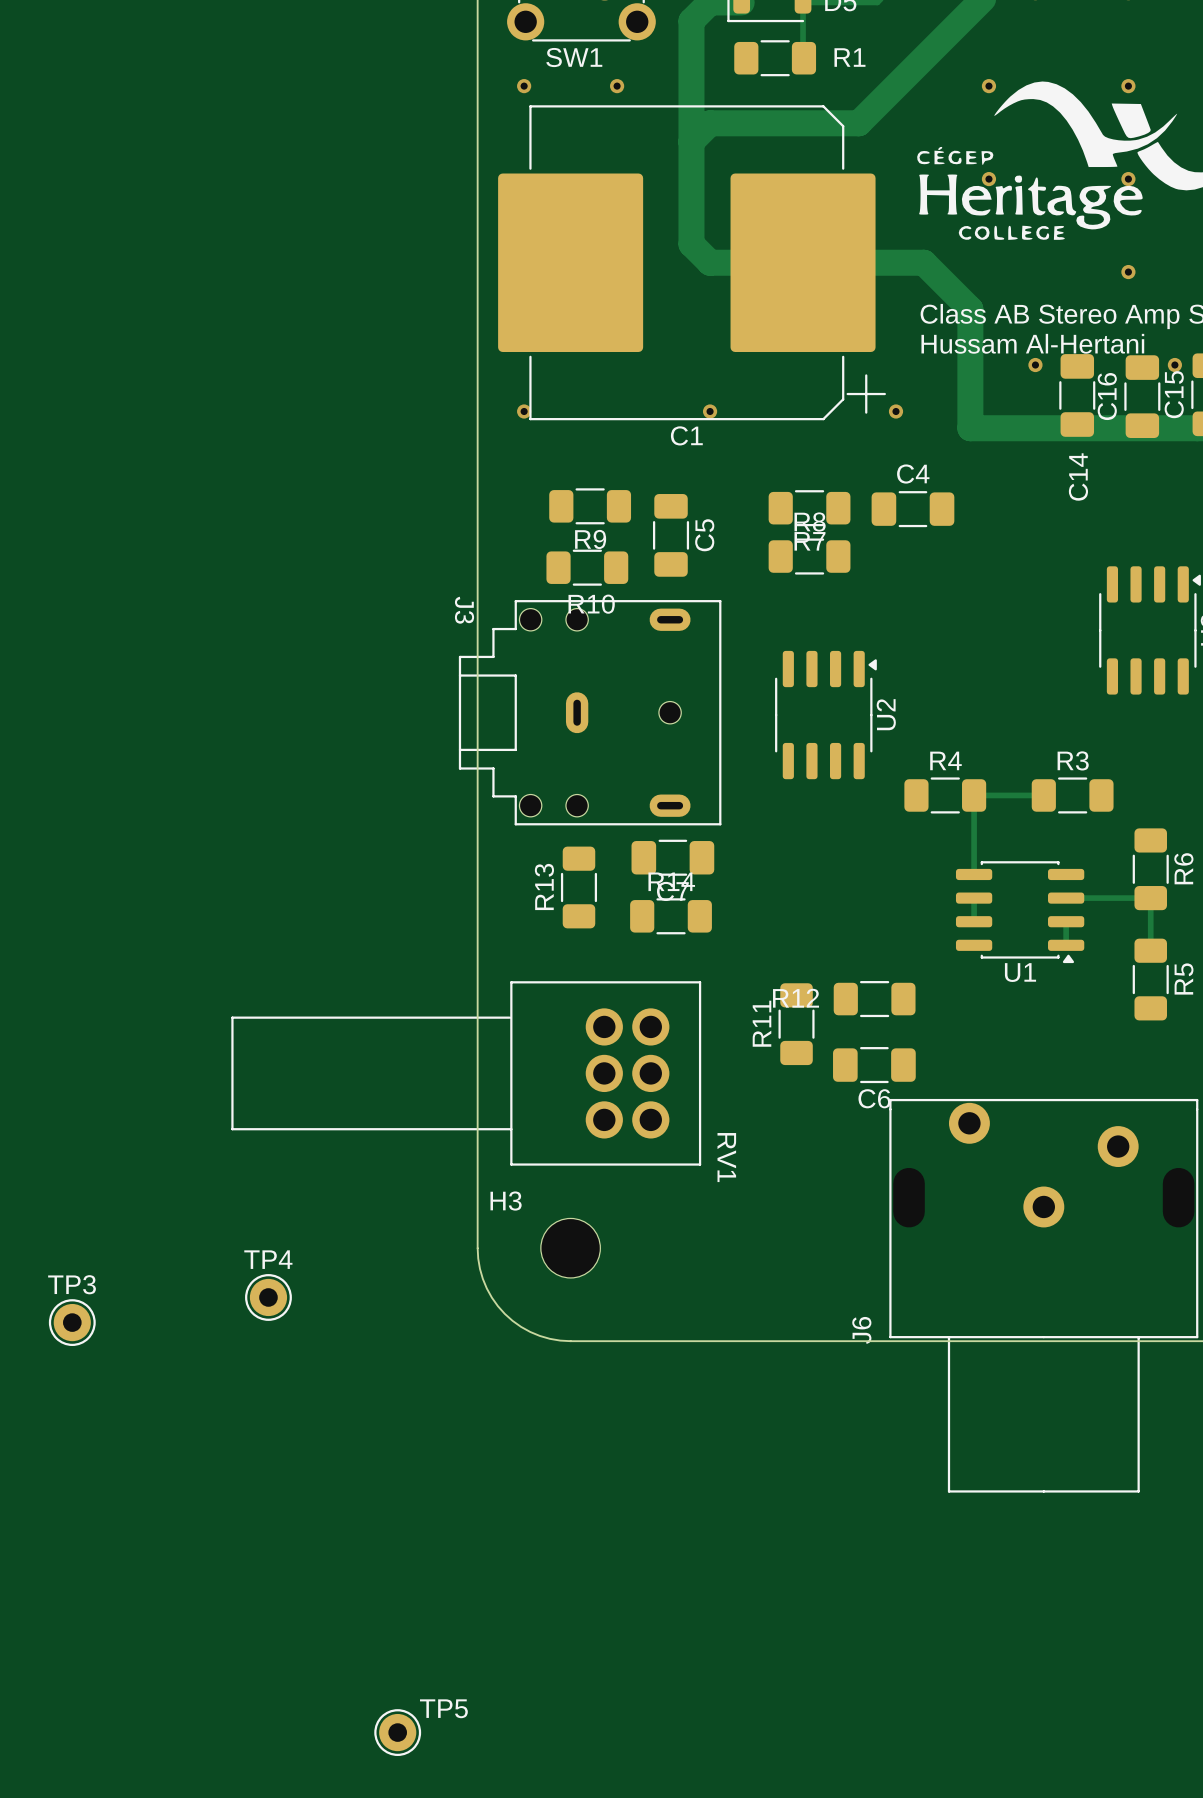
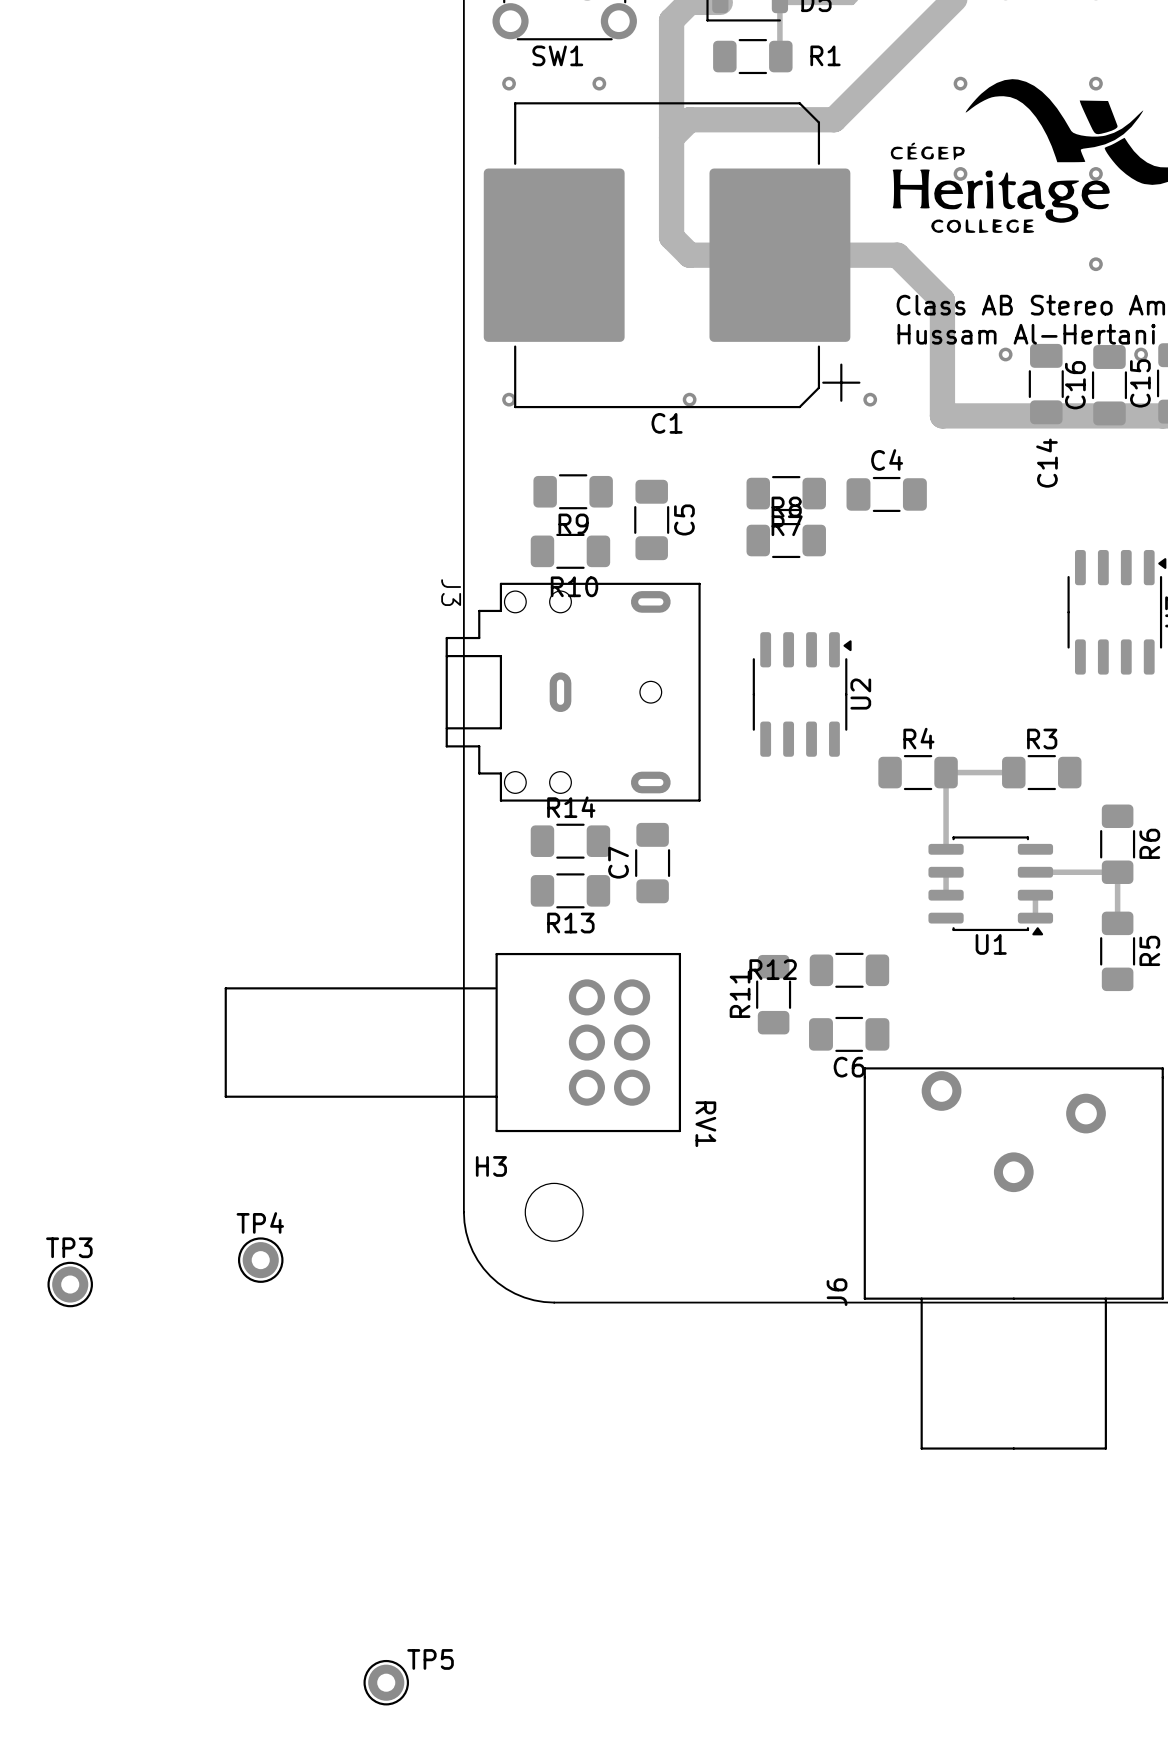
C7 rotation: 0° (672, 857) -> 90° clockwise (652, 863)
R13 name position: R13 (544, 886) -> R13 (570, 923)
R13 rotation: 0° (578, 887) -> 90° clockwise (570, 890)
R14 position: (671, 916) -> (570, 841)

